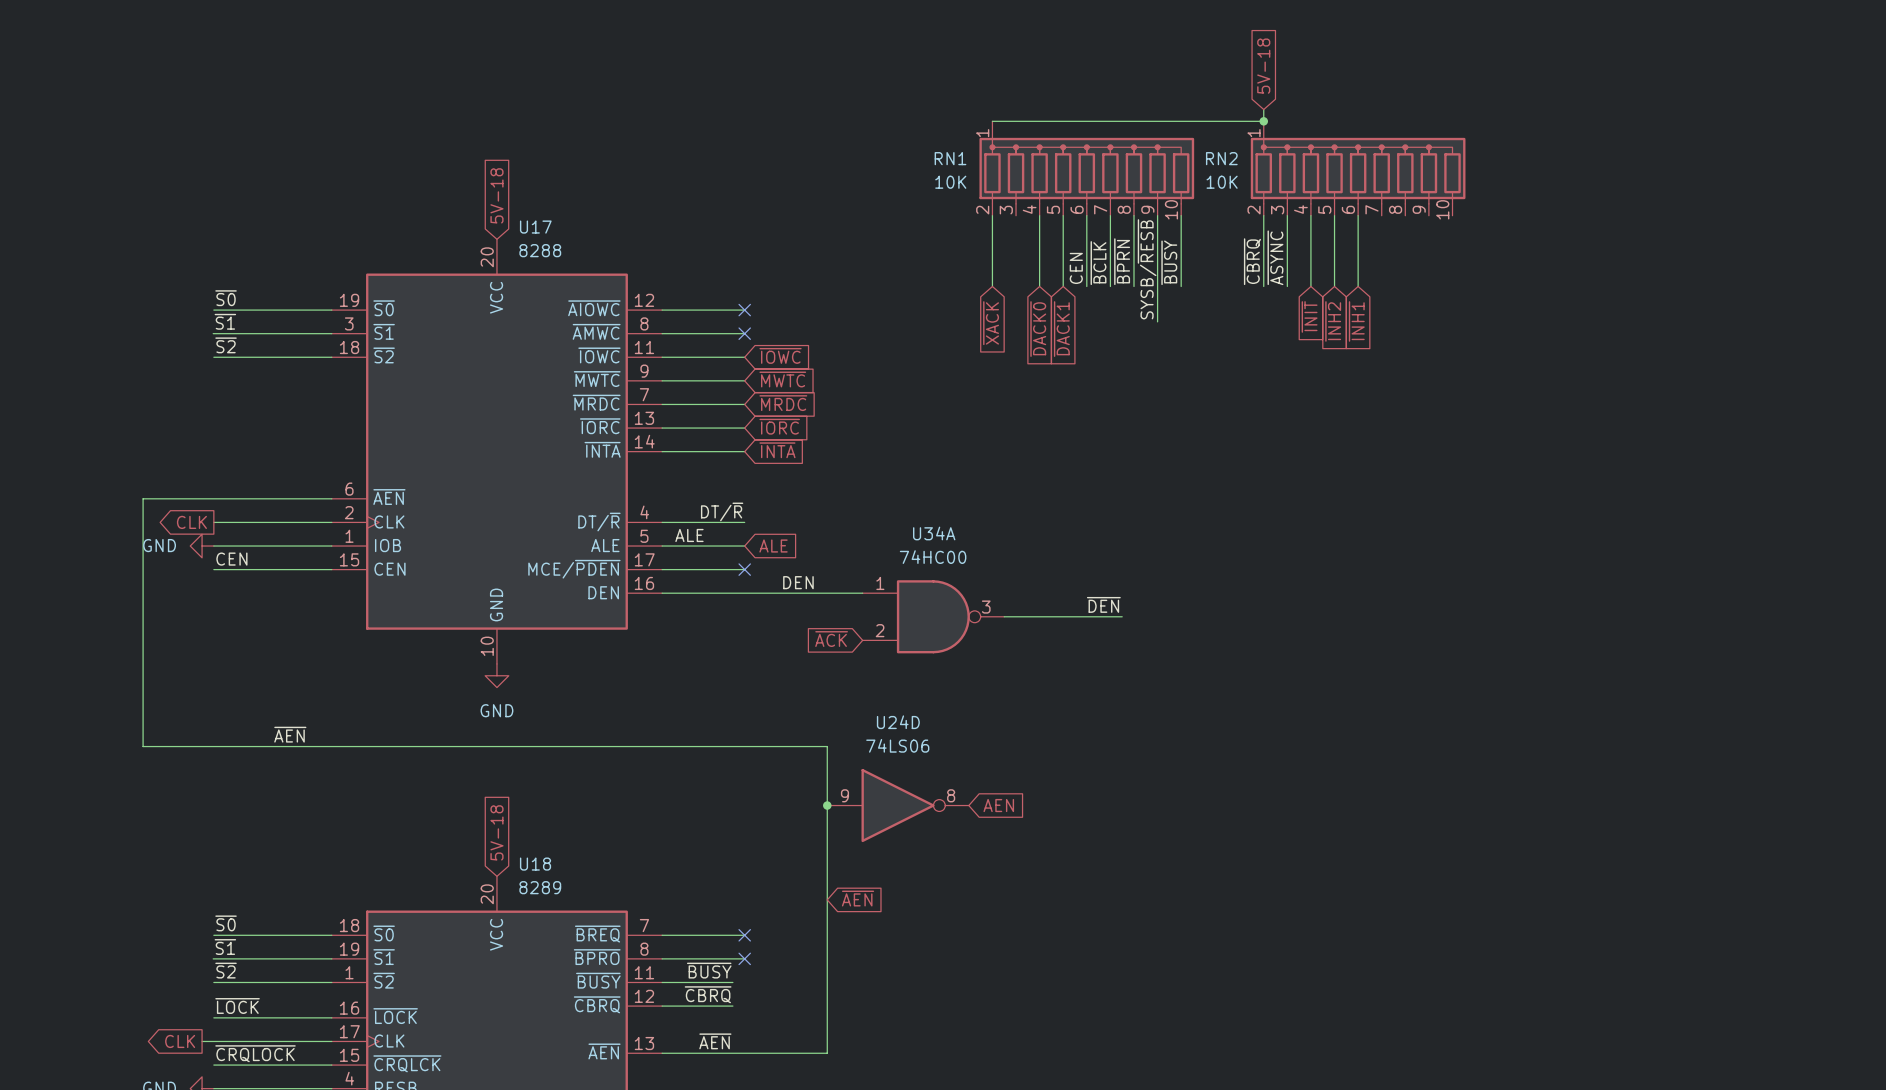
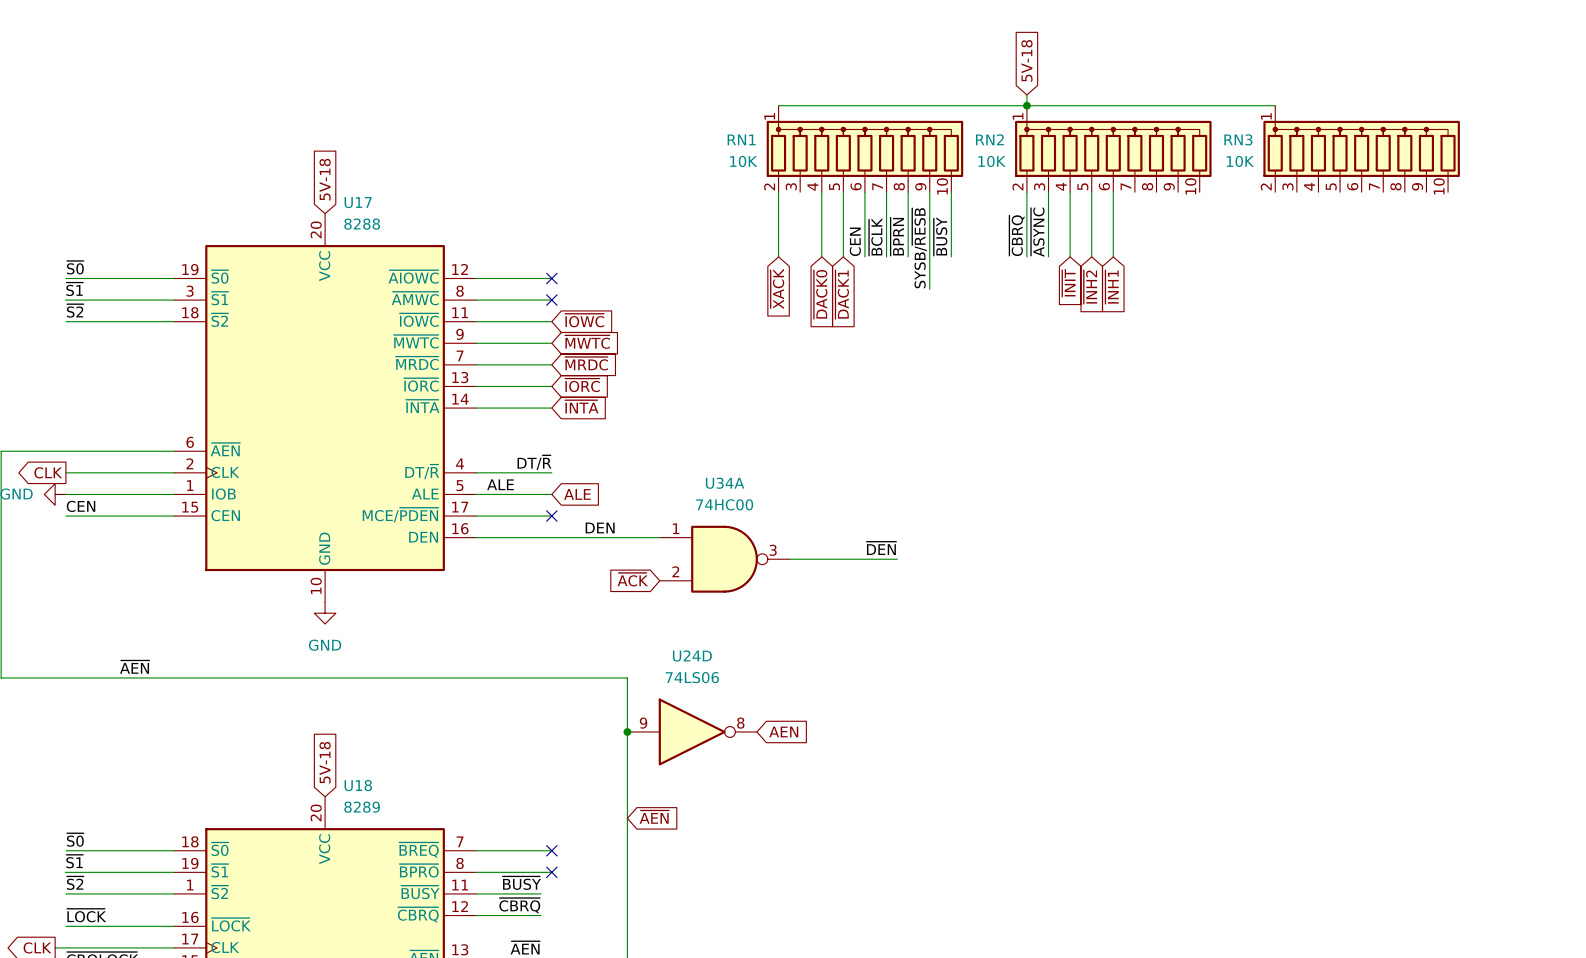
wire: none -> (1026, 105) (1275, 105)
RN3: none -> 10K (1361, 148)

